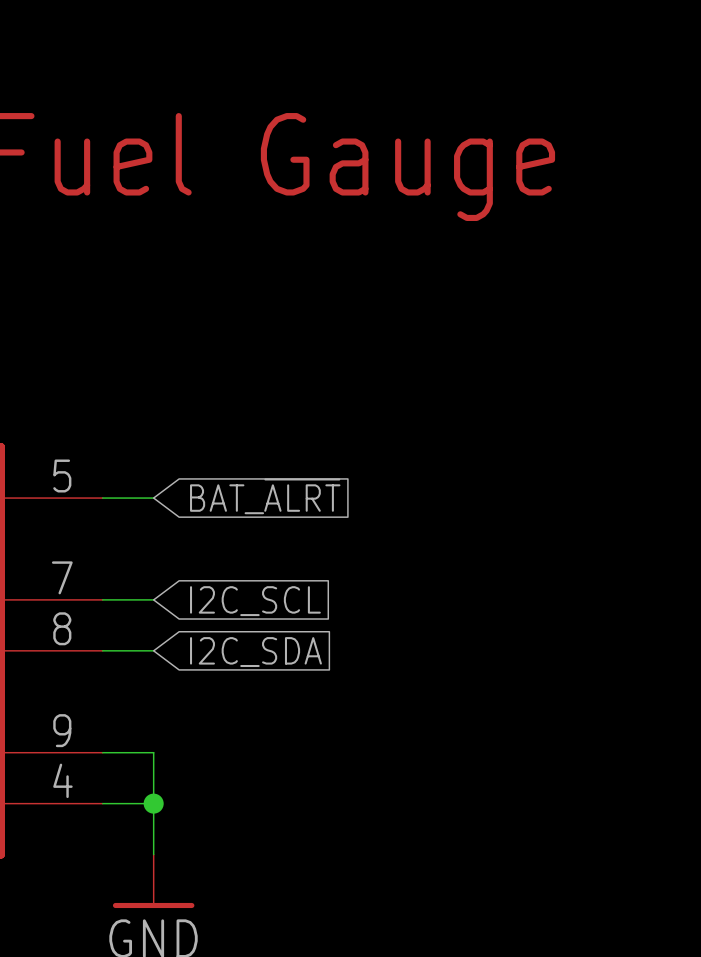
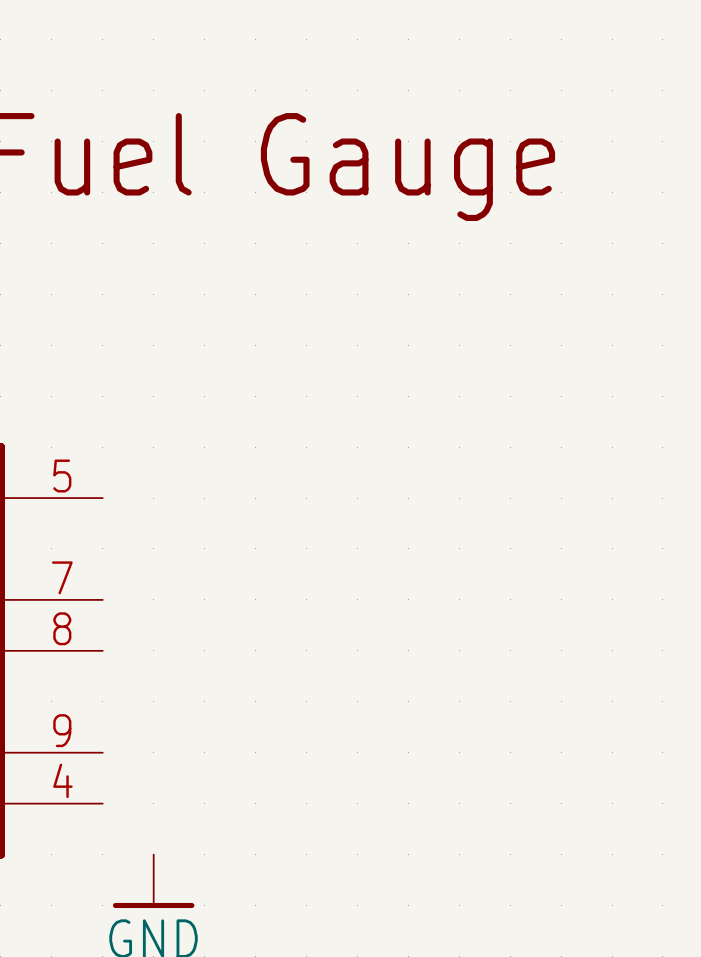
global label: BAT_~{ALRT} (265, 496) -> none
wire: (102, 498) (153, 498) -> none
wire: (102, 599) (153, 599) -> none
global label: I2C_SCL (255, 601) -> none
wire: (102, 650) (153, 650) -> none
global label: I2C_SDA (255, 652) -> none
wire: (102, 752) (153, 752) (153, 854) -> none
wire: (102, 803) (153, 803) -> none
junction: (153, 803) -> none

